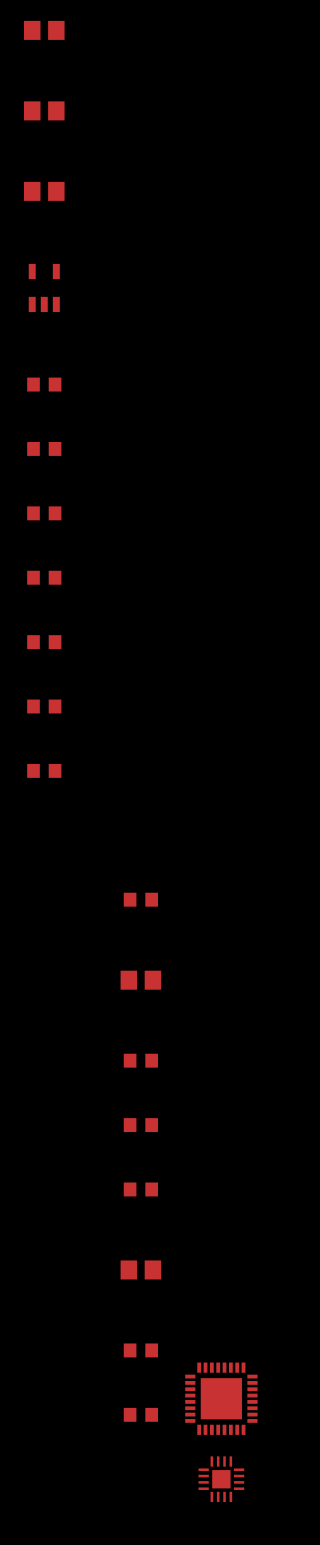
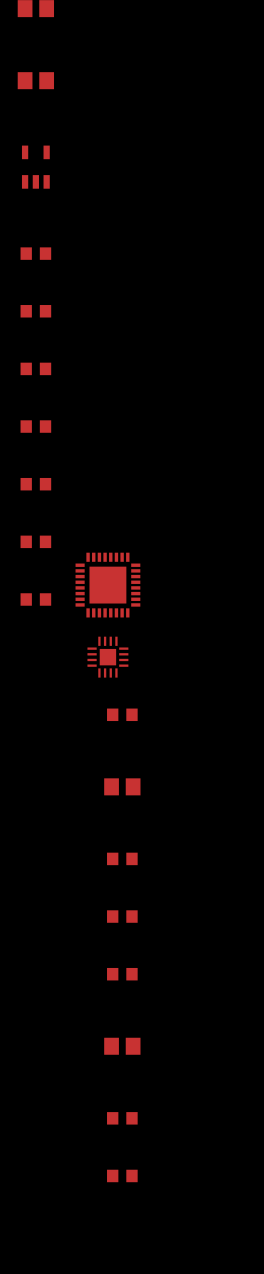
part: none -> (107, 585)
part: none -> (107, 657)
part: (221, 1398) -> none
part: (221, 1479) -> none

